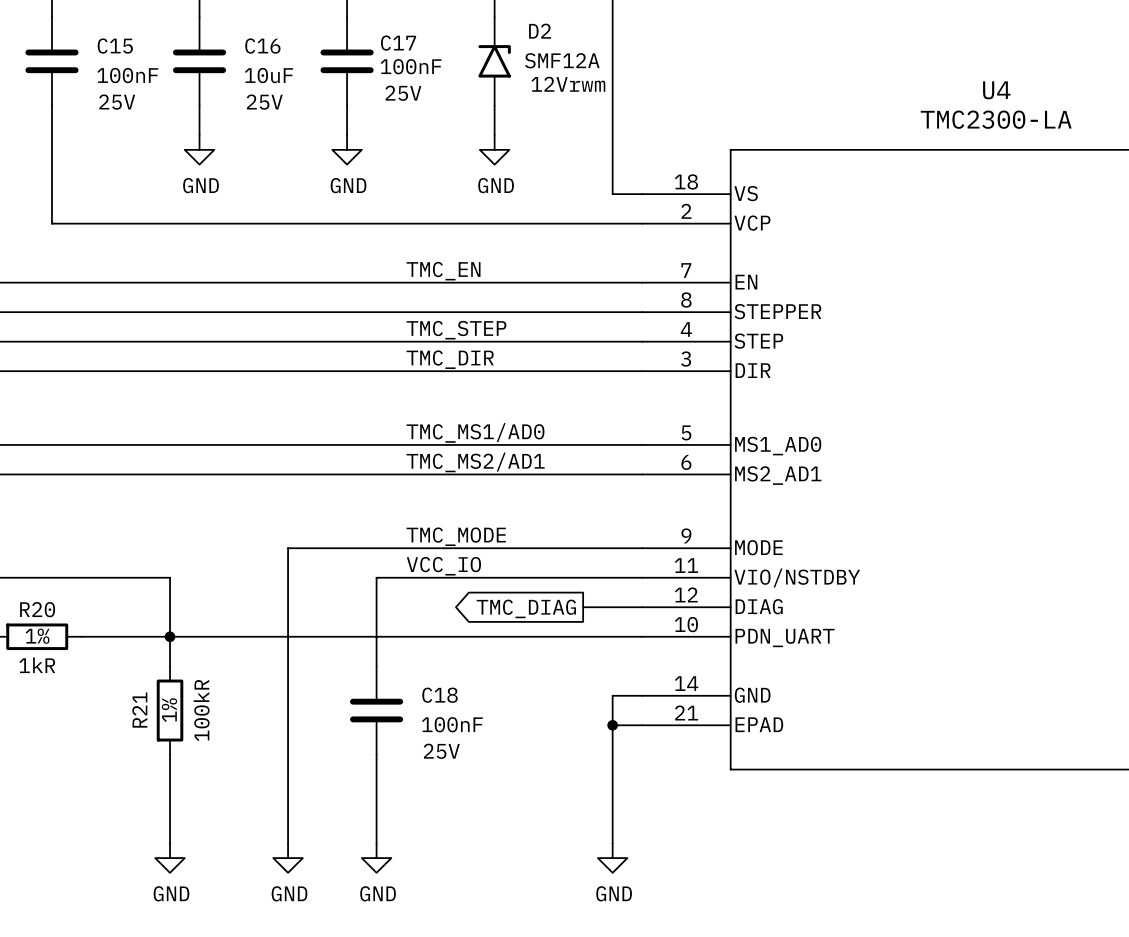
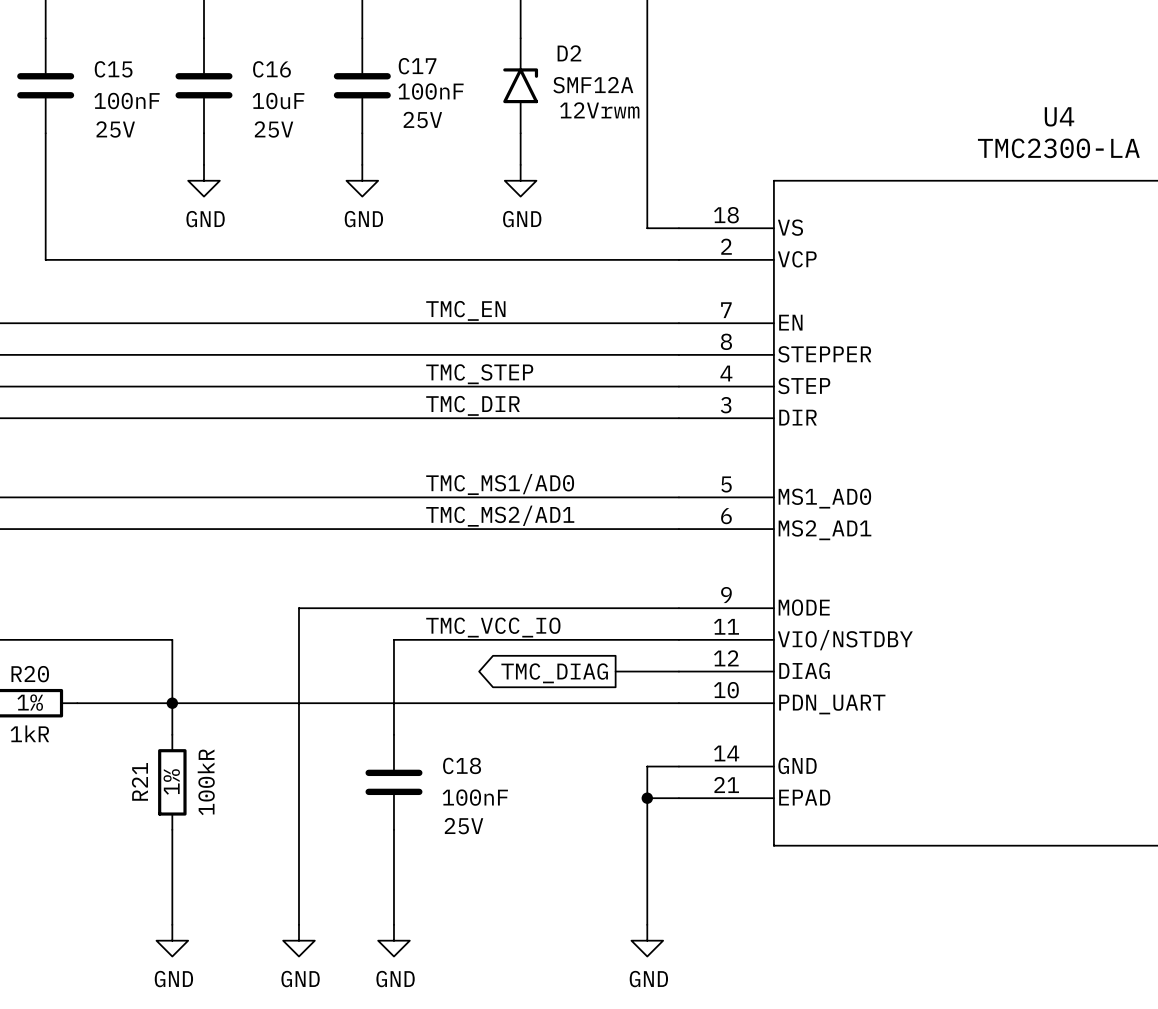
label: TMC_MODE (456, 536) -> none
label: VCC_IO (443, 566) -> TMC_VCC_IO (493, 627)

